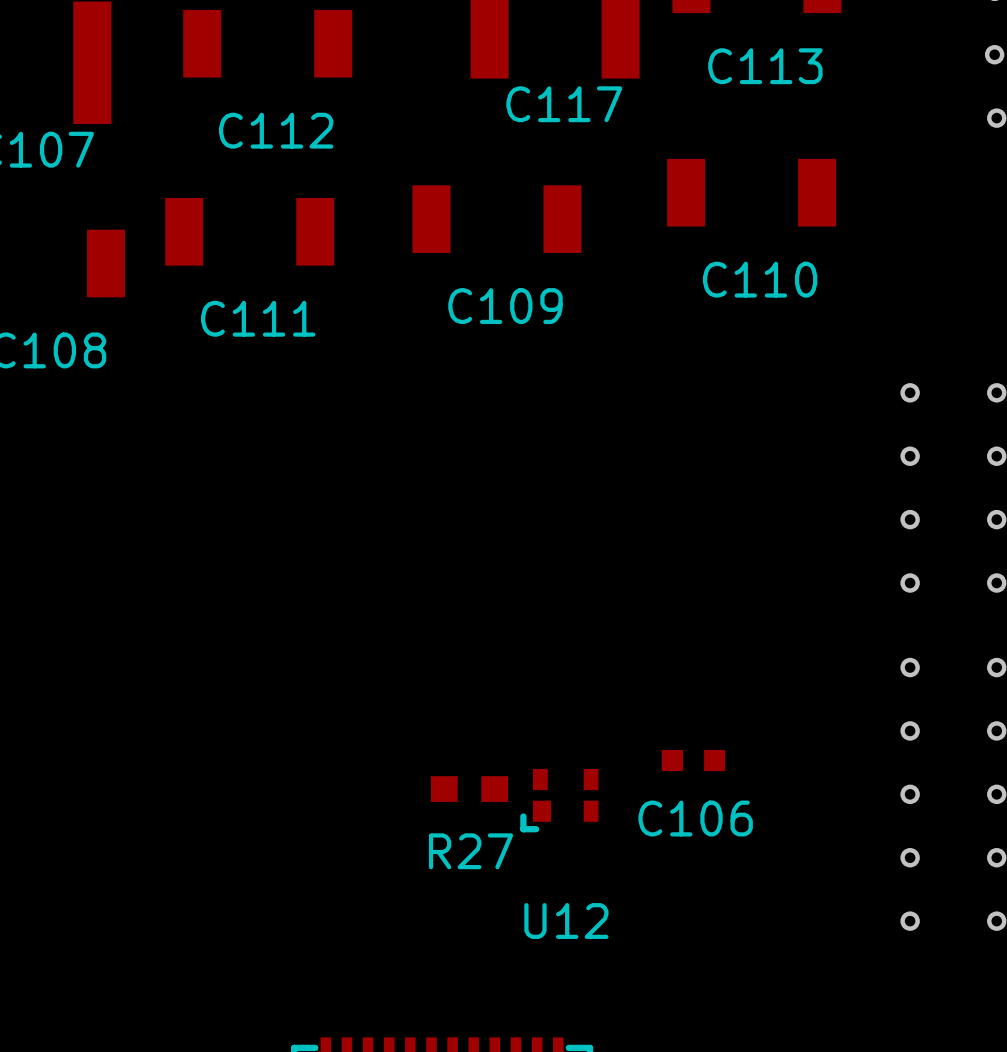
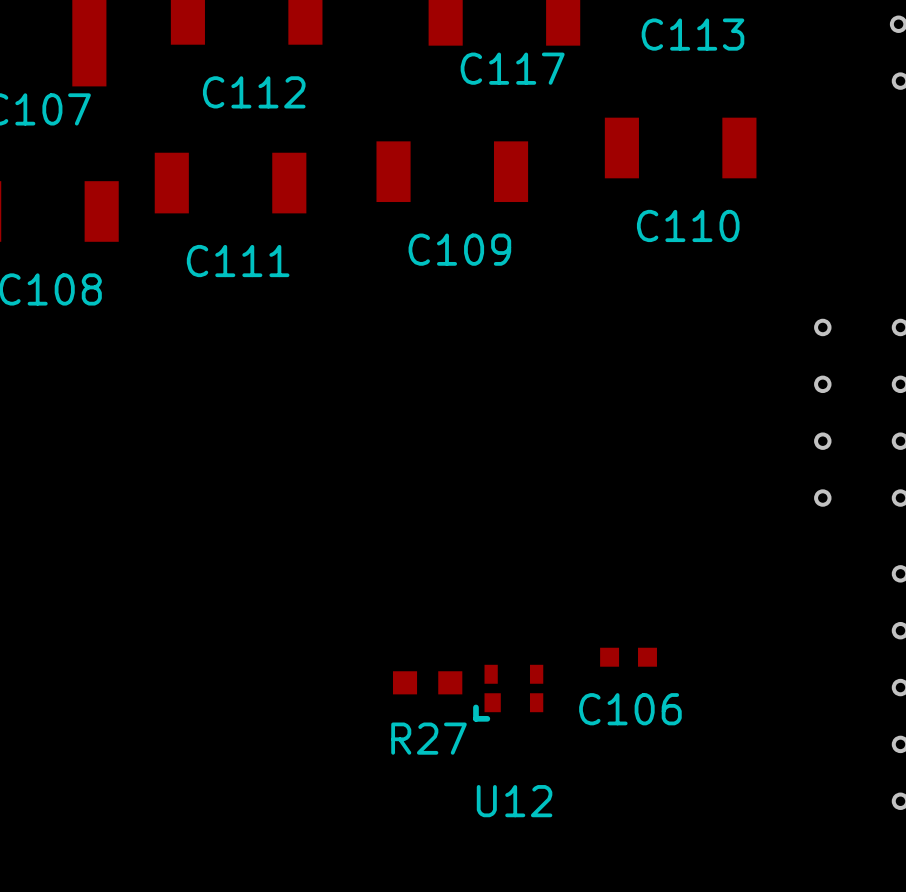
via: (910, 667) -> none
via: (910, 730) -> none
via: (910, 794) -> none
via: (910, 857) -> none
via: (910, 921) -> none

